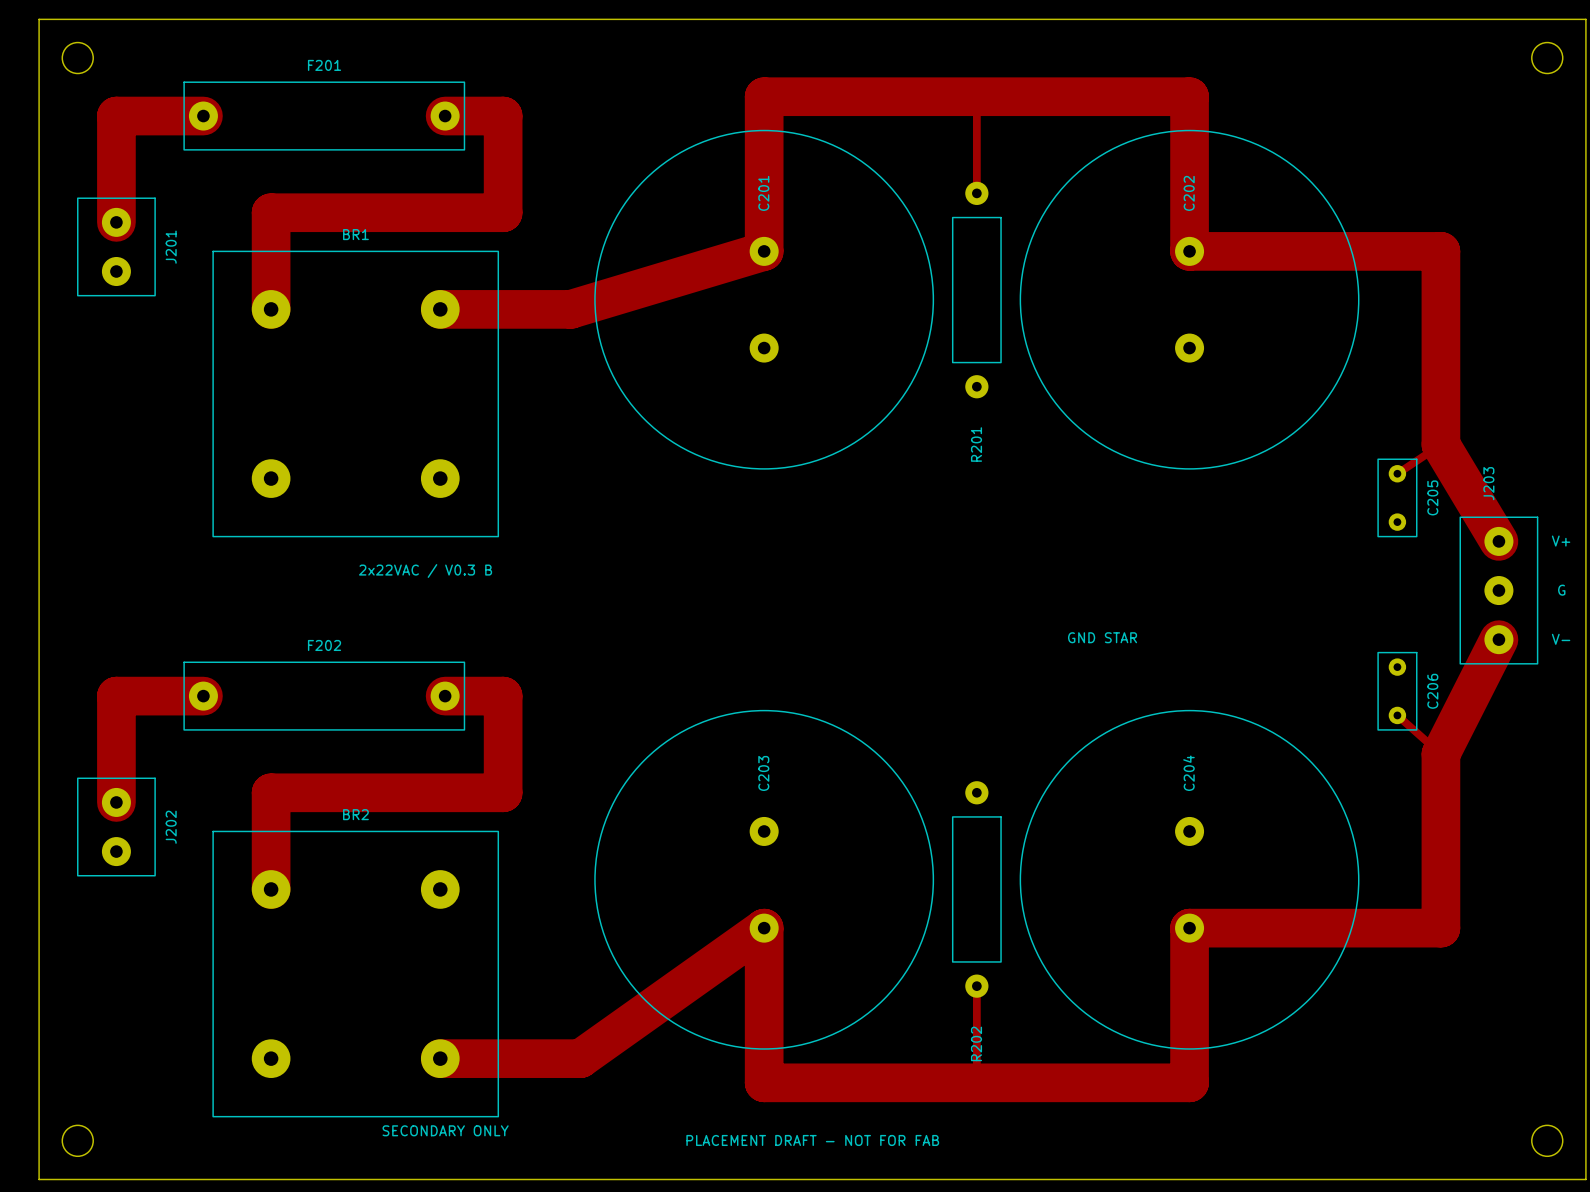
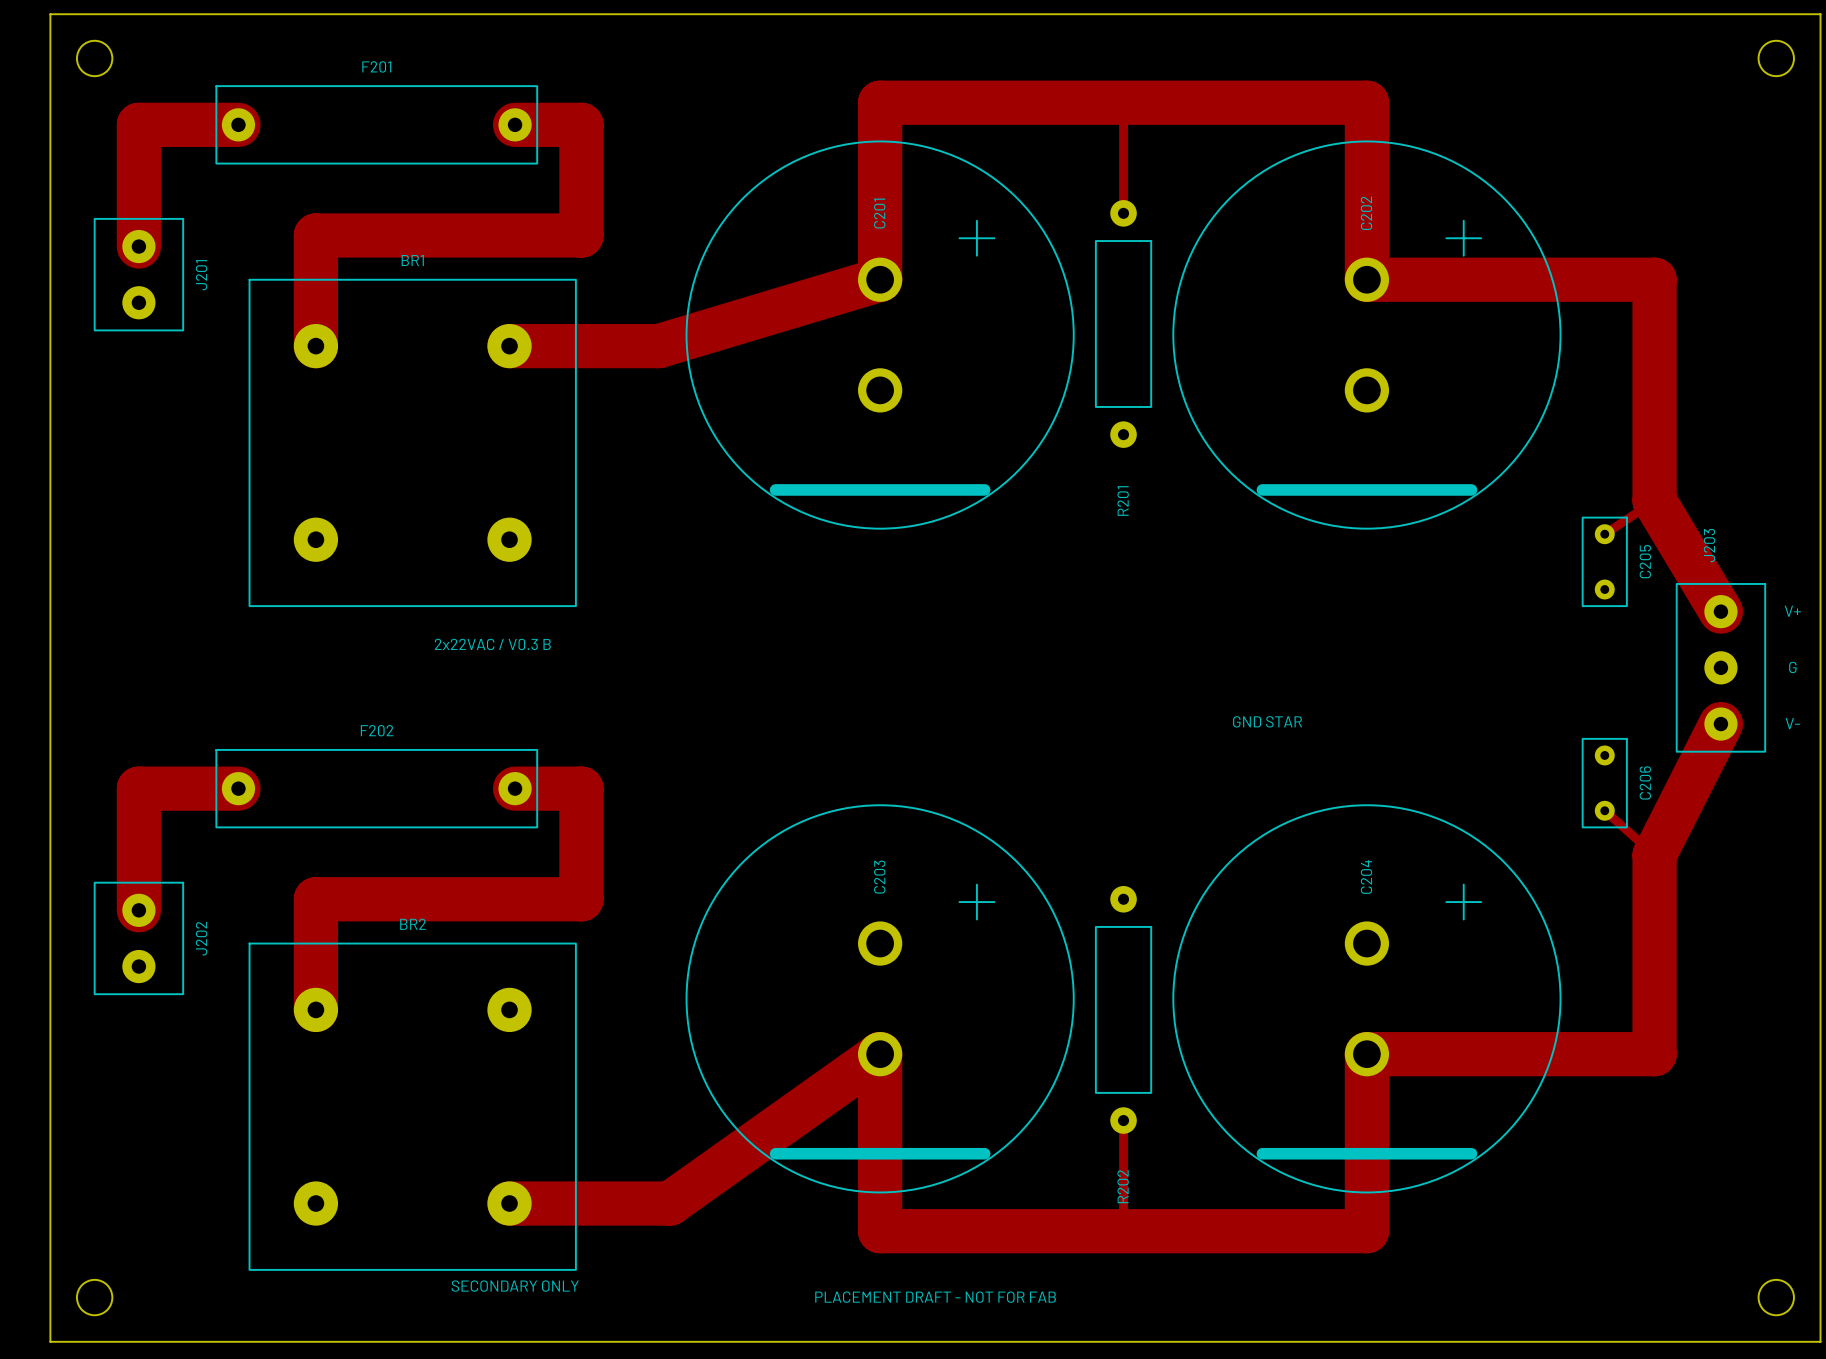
C201 footprint: [594, 129, 935, 470] -> [685, 140, 1075, 530]
C202 footprint: [1019, 129, 1360, 470] -> [1172, 140, 1562, 530]
C203 footprint: [594, 709, 935, 1050] -> [685, 804, 1075, 1194]
C204 footprint: [1019, 709, 1360, 1050] -> [1172, 804, 1562, 1194]

